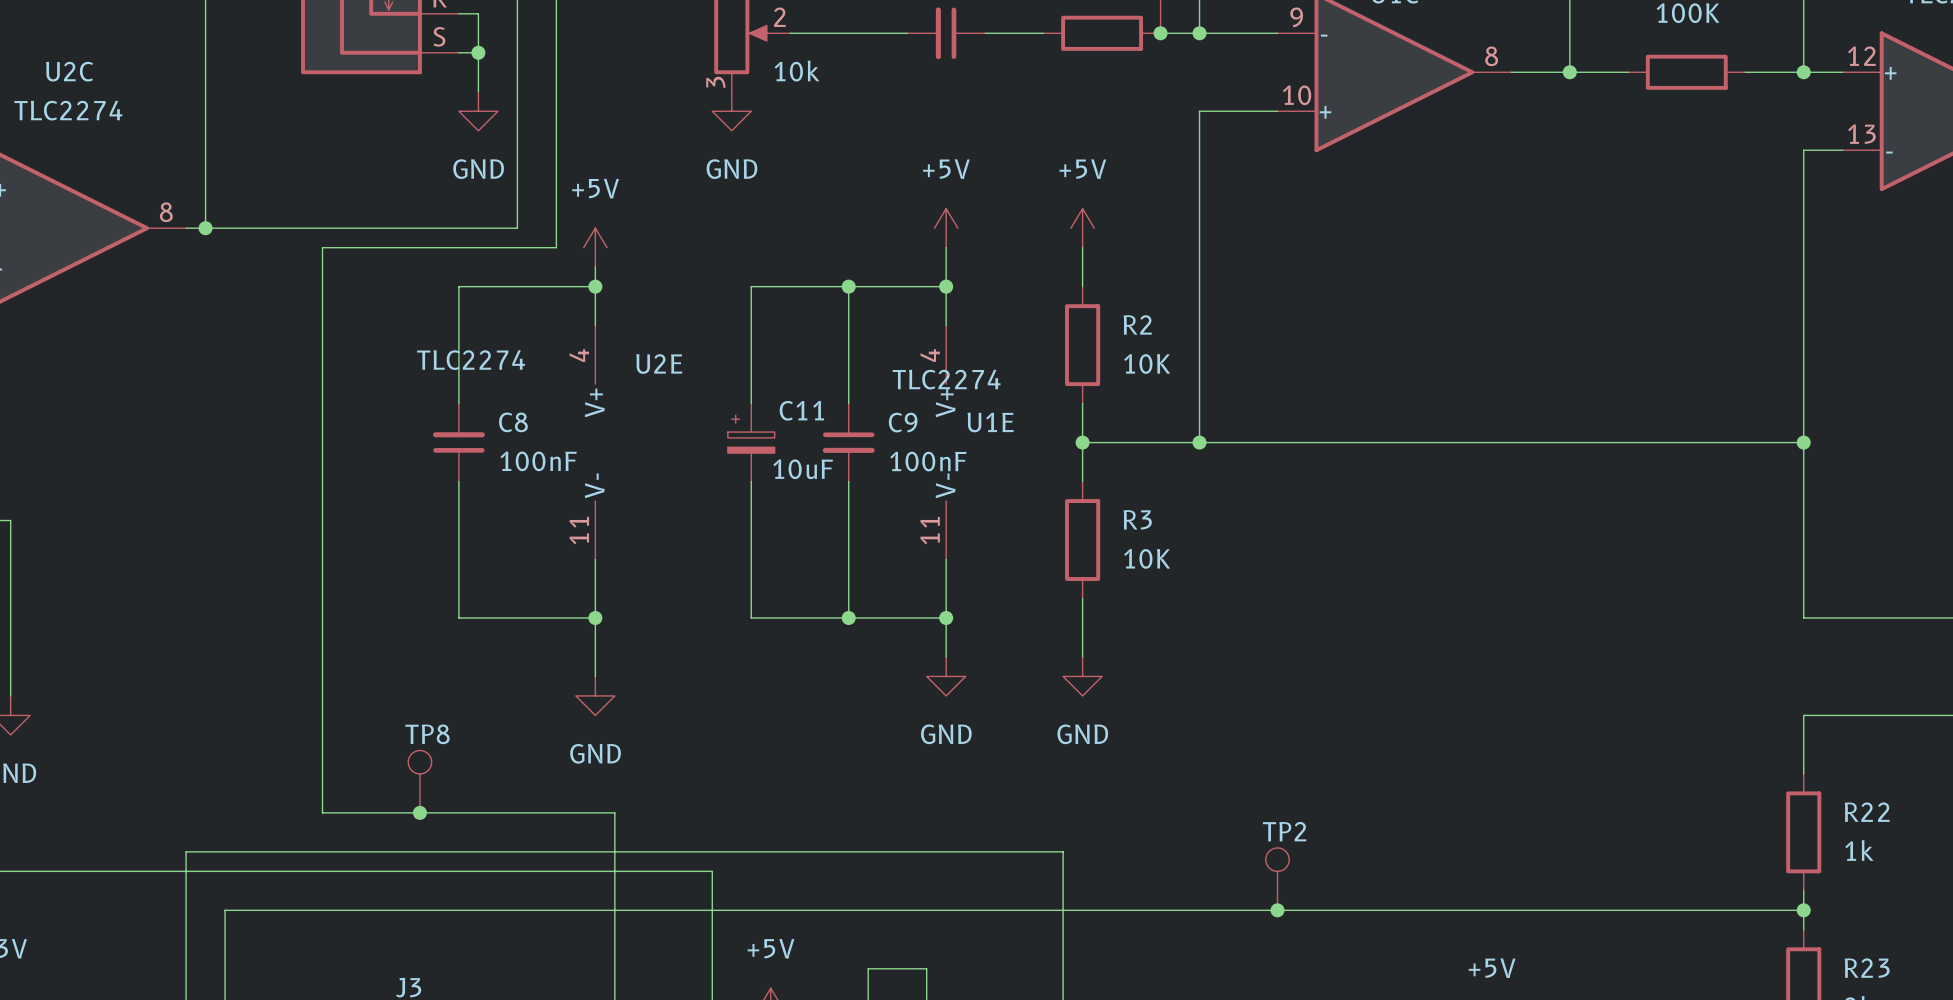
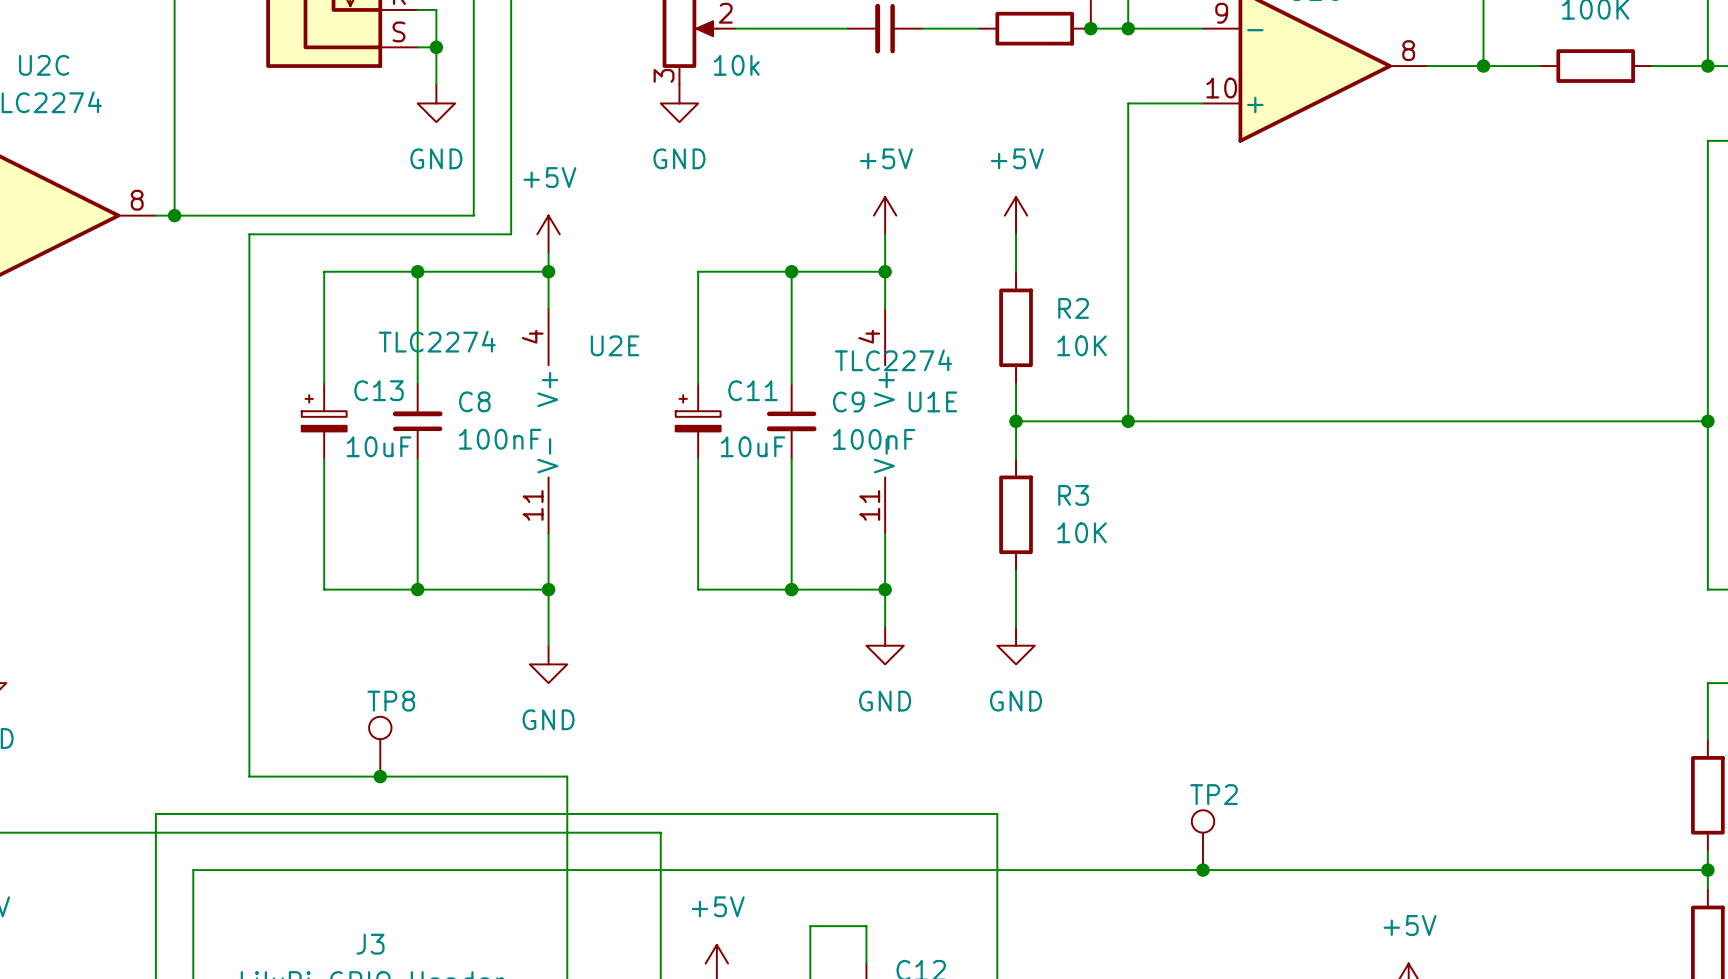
wire: (322, 247) (322, 812) -> (286, 234) (249, 234) (249, 776) (286, 776)
wire: none -> (417, 271) (324, 271) (324, 383)
junction: none -> (417, 271)
C13: none -> 10uF (324, 421)
wire: none -> (324, 458) (324, 589) (417, 589)
junction: none -> (417, 589)

